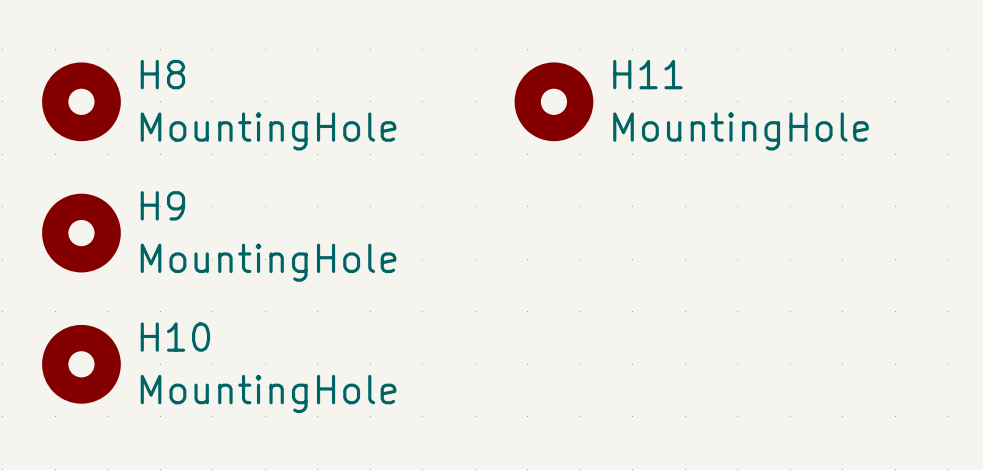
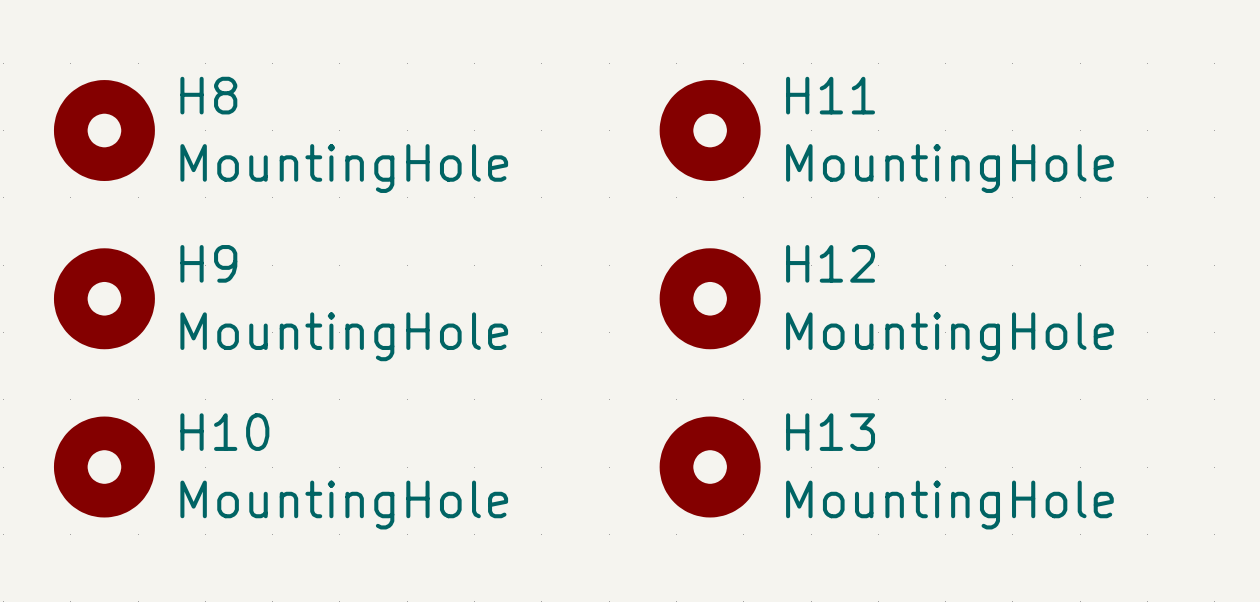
H12: none -> MountingHole (710, 298)
H13: none -> MountingHole (710, 467)

